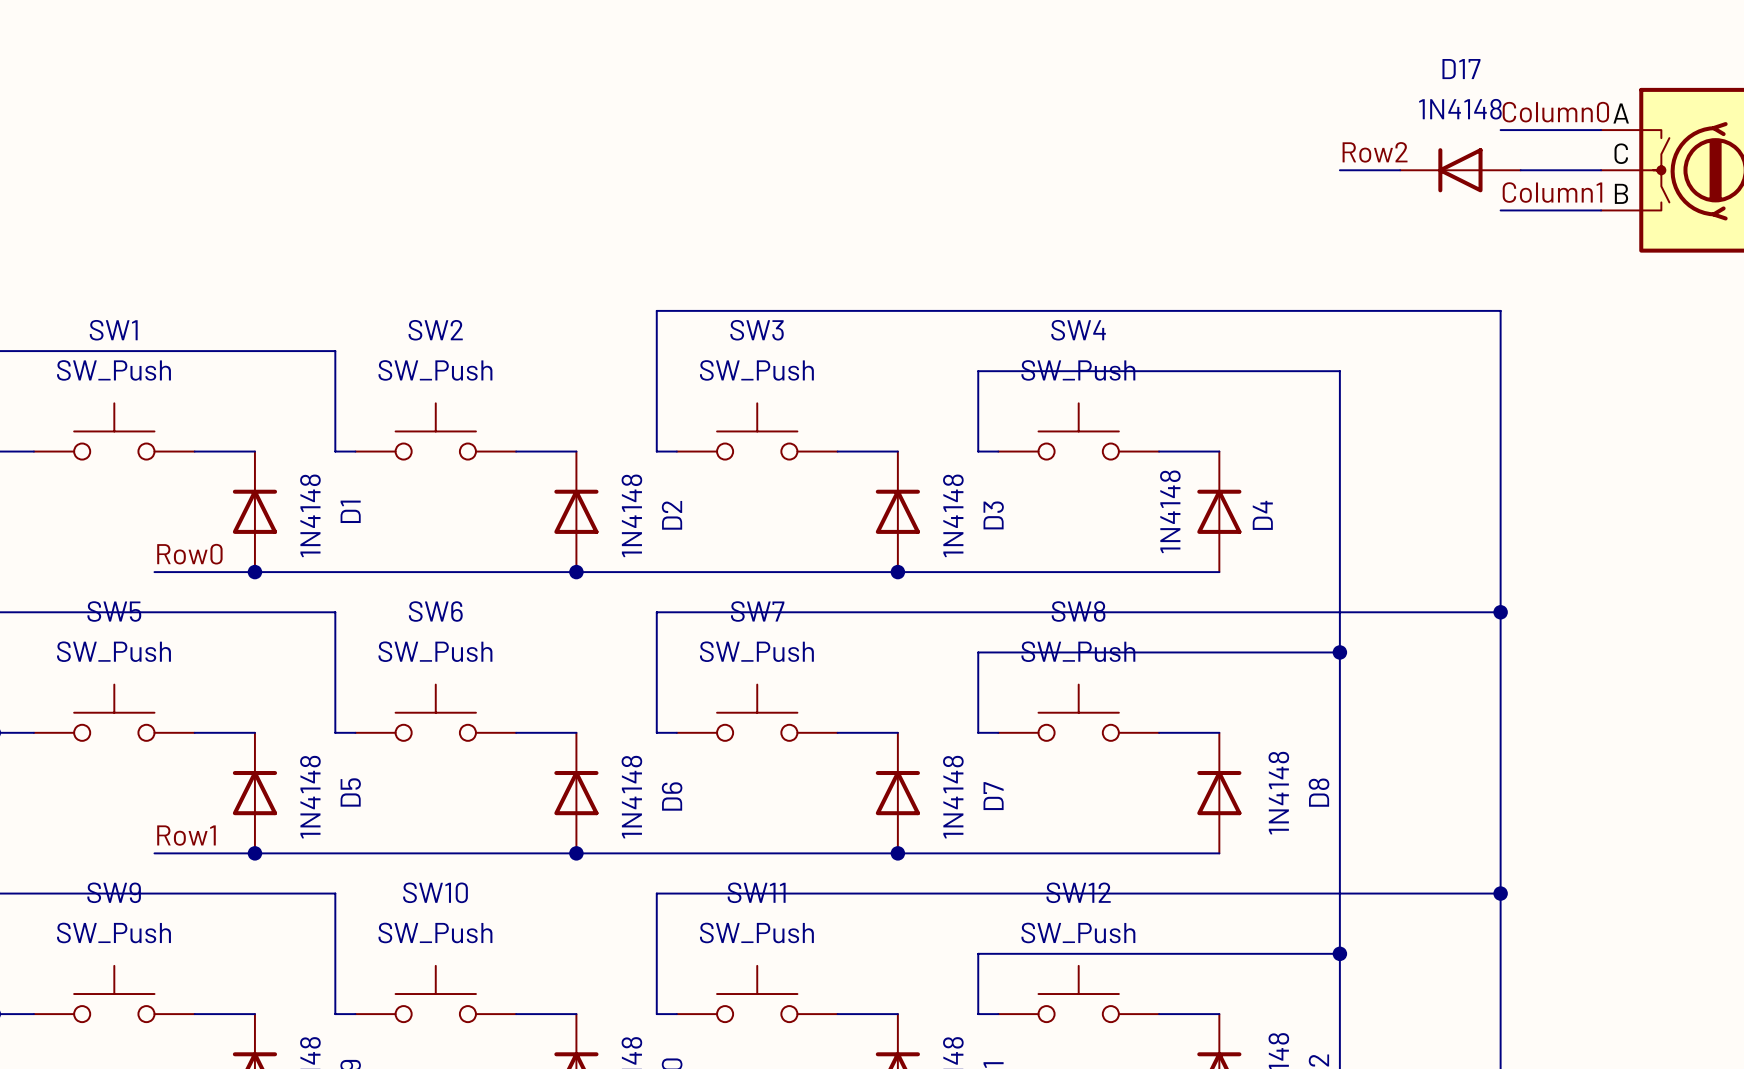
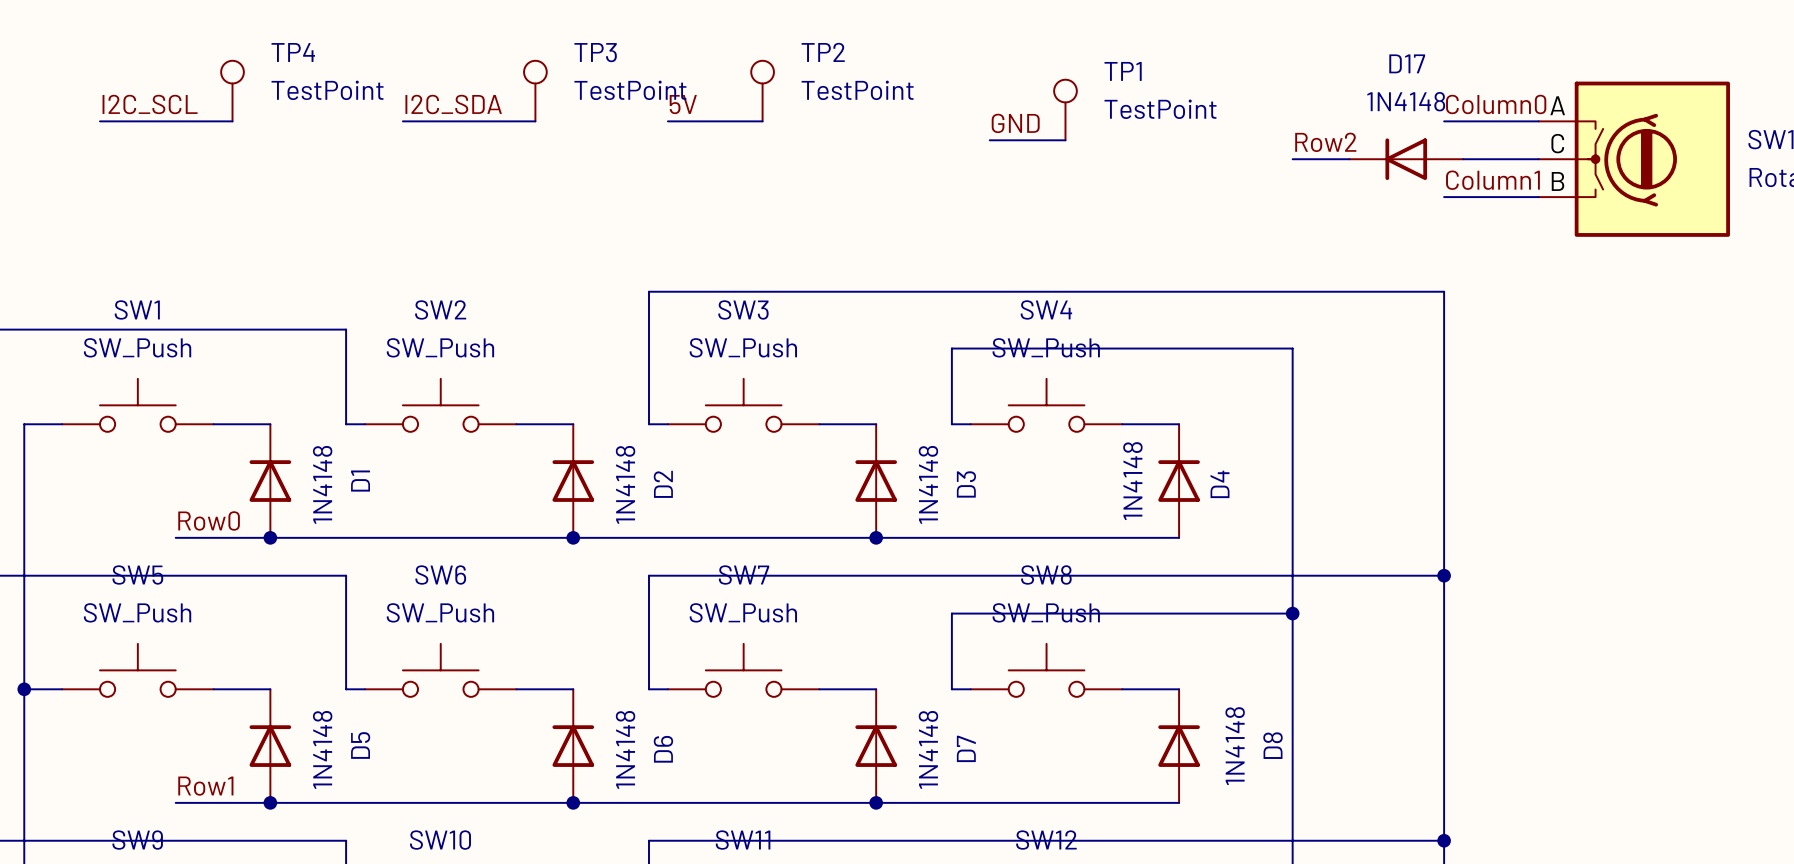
TP4: none -> TestPoint (232, 91)
TP3: none -> TestPoint (535, 91)
TP2: none -> TestPoint (762, 91)
label: none -> I2C_SCL (150, 104)
label: none -> I2C_SDA (453, 104)
label: none -> 5V (683, 104)
TP1: none -> TestPoint (1065, 110)
wire: none -> (99, 121) (232, 121)
wire: none -> (402, 121) (535, 121)
wire: none -> (667, 121) (762, 121)
label: none -> GND (1015, 123)
wire: none -> (989, 140) (1065, 140)

